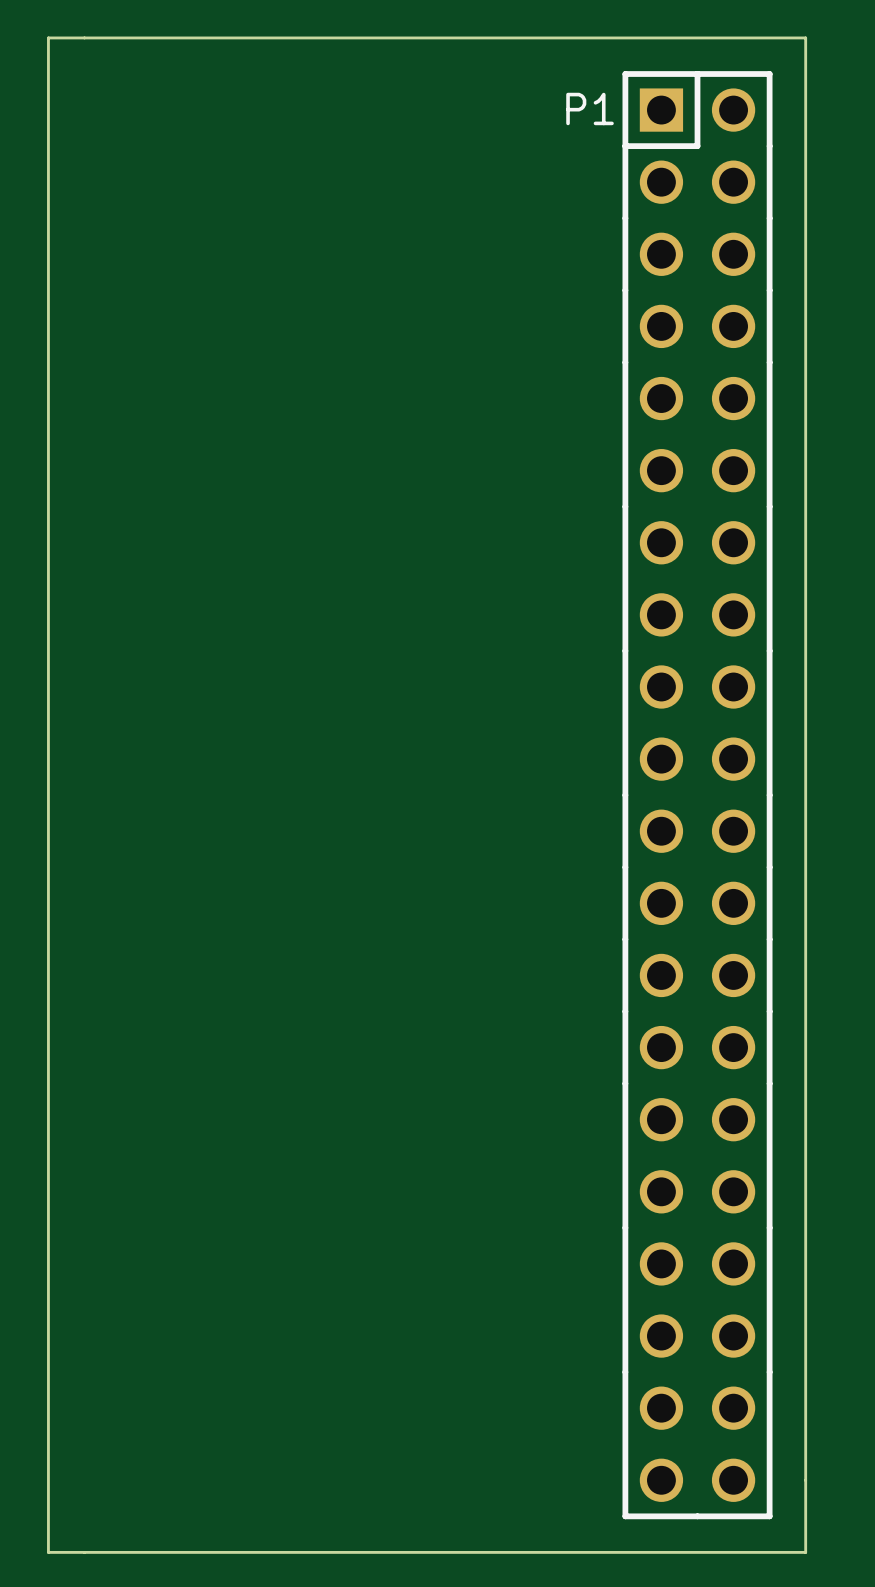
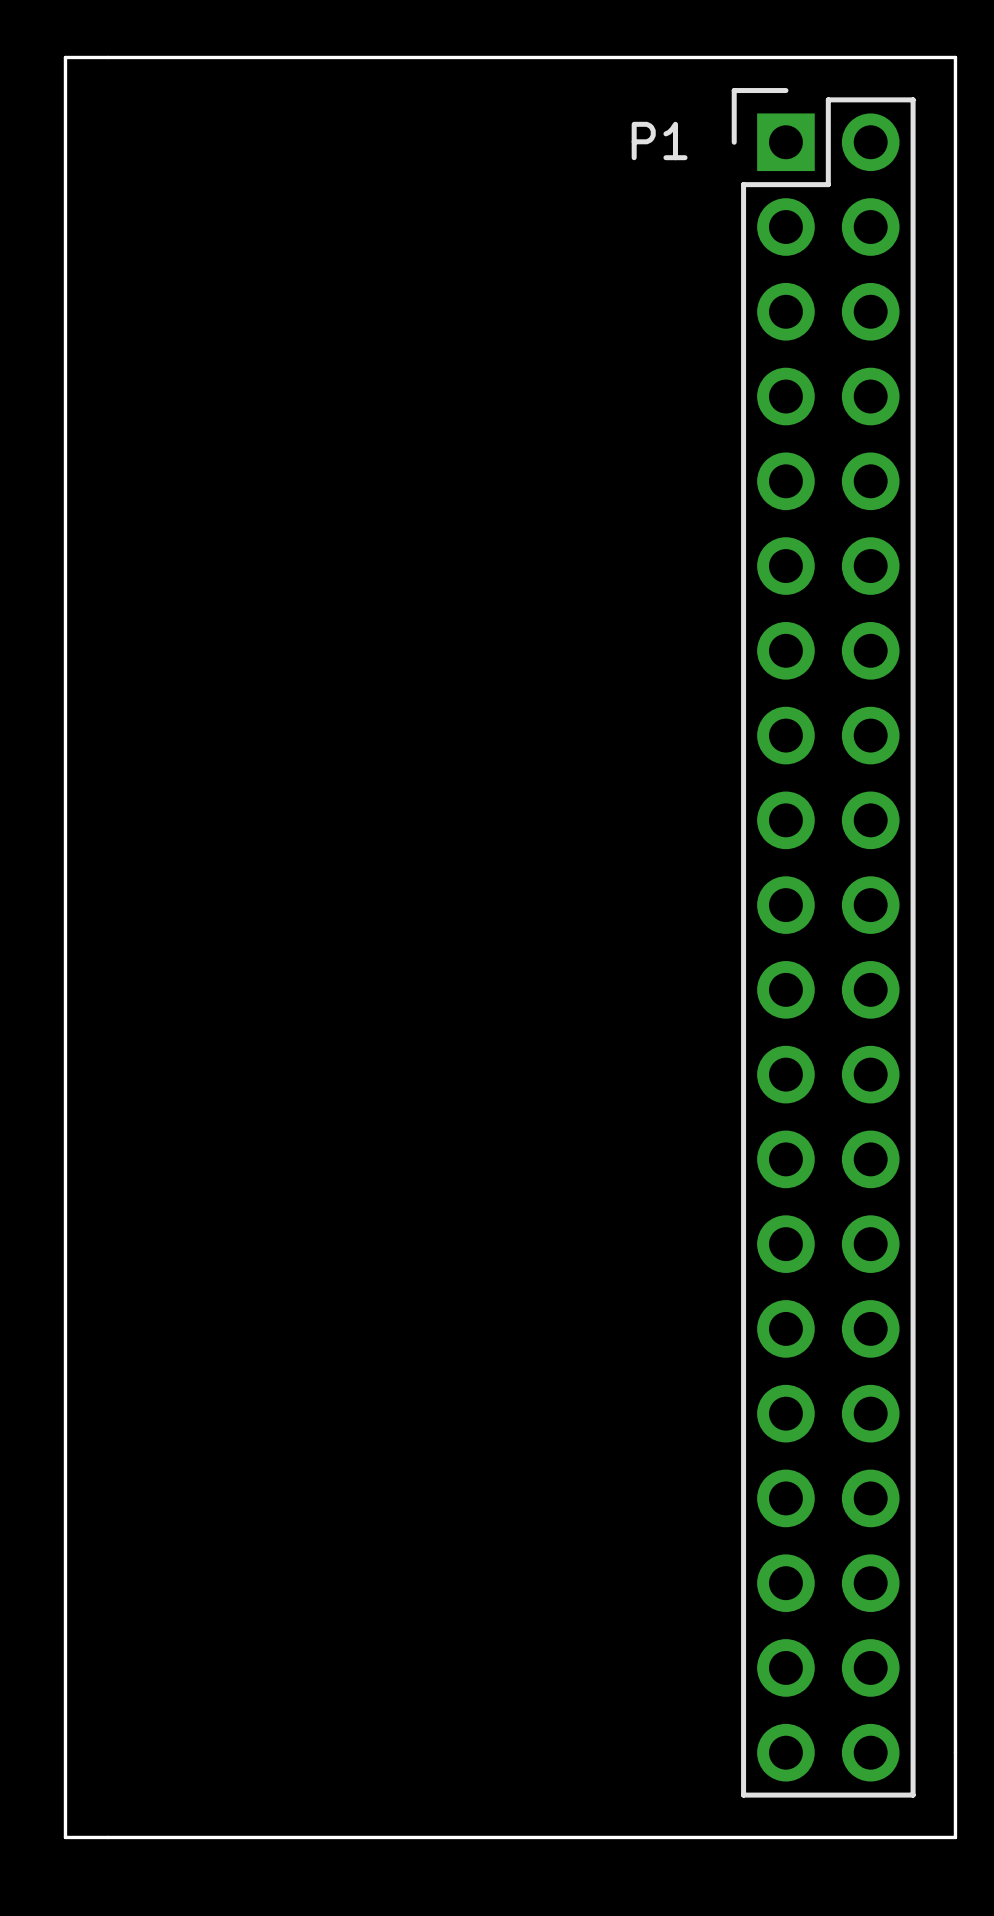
P1 footprint: [622, 71, 773, 1520] -> [731, 88, 916, 1798]
P1 name position: P1 (590, 108) -> P1 (659, 141)

